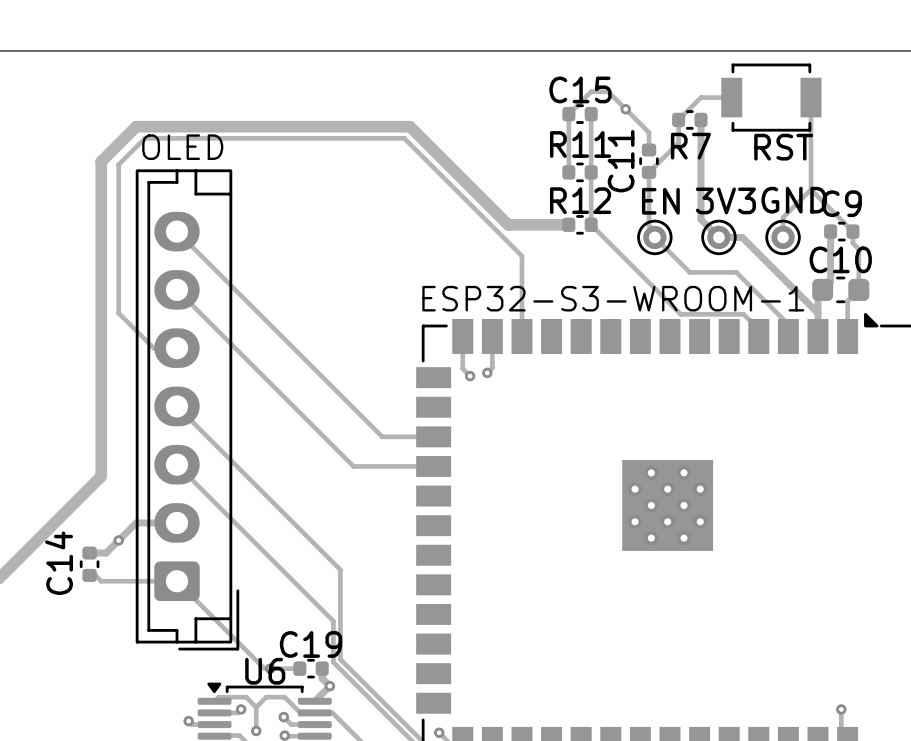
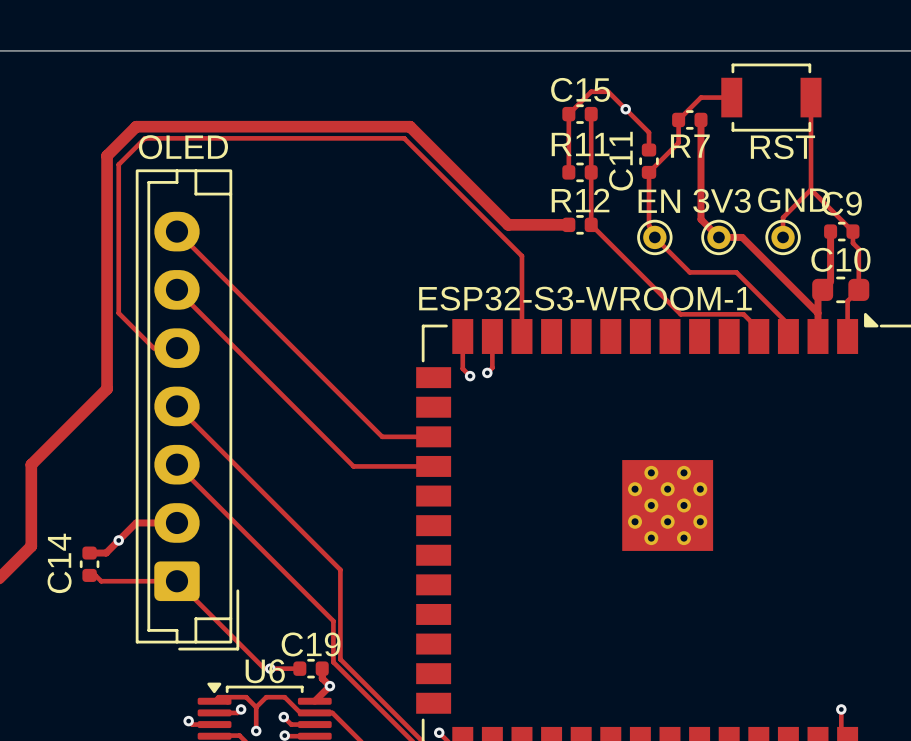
track: (107, 155) (101, 161) (101, 476) (31, 546) -> (107, 155) (107, 388) (31, 464) (31, 546)

